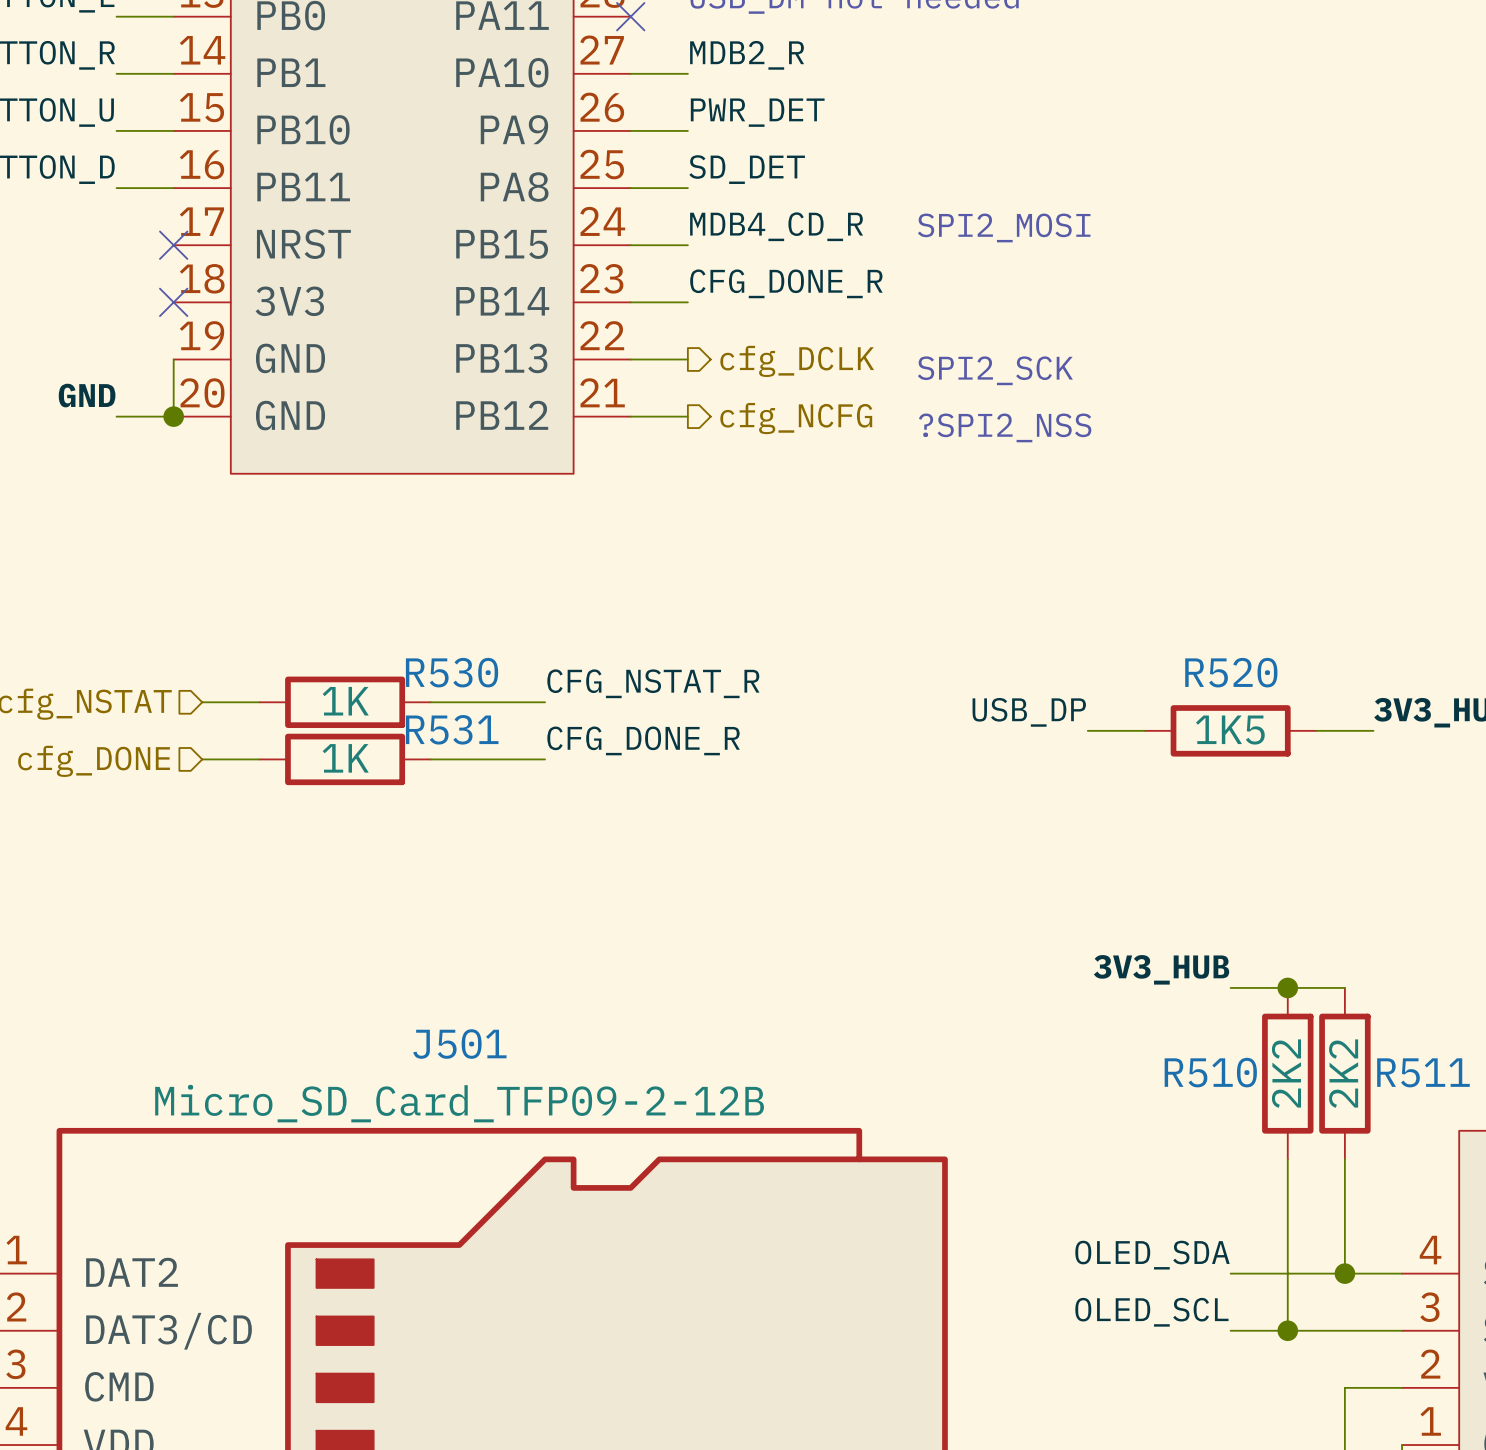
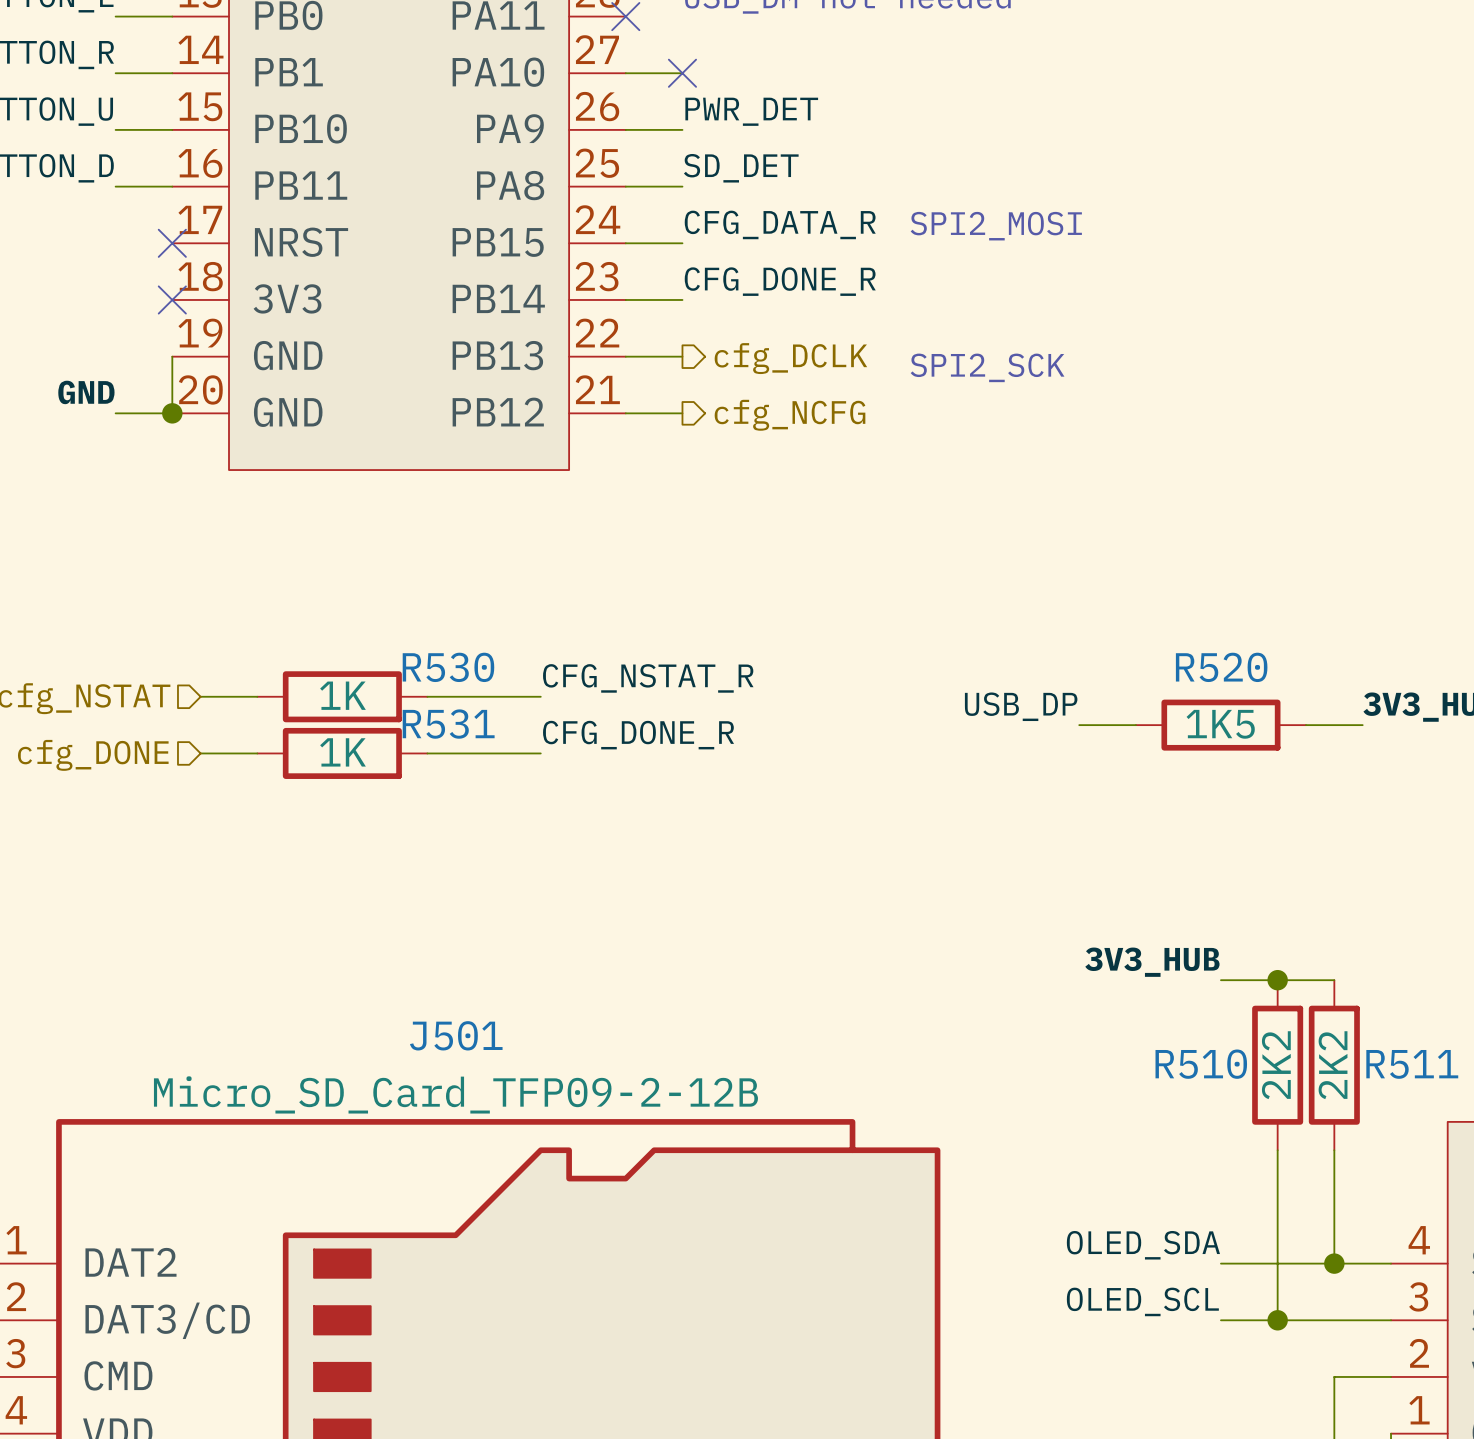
label: MDB2_R (747, 55) -> none
no-connect mark: none -> (682, 73)
label: MDB4_CD_R (776, 226) -> CFG_DATA_R (780, 224)
text: ?SPI2_NSS (1005, 427) -> none

